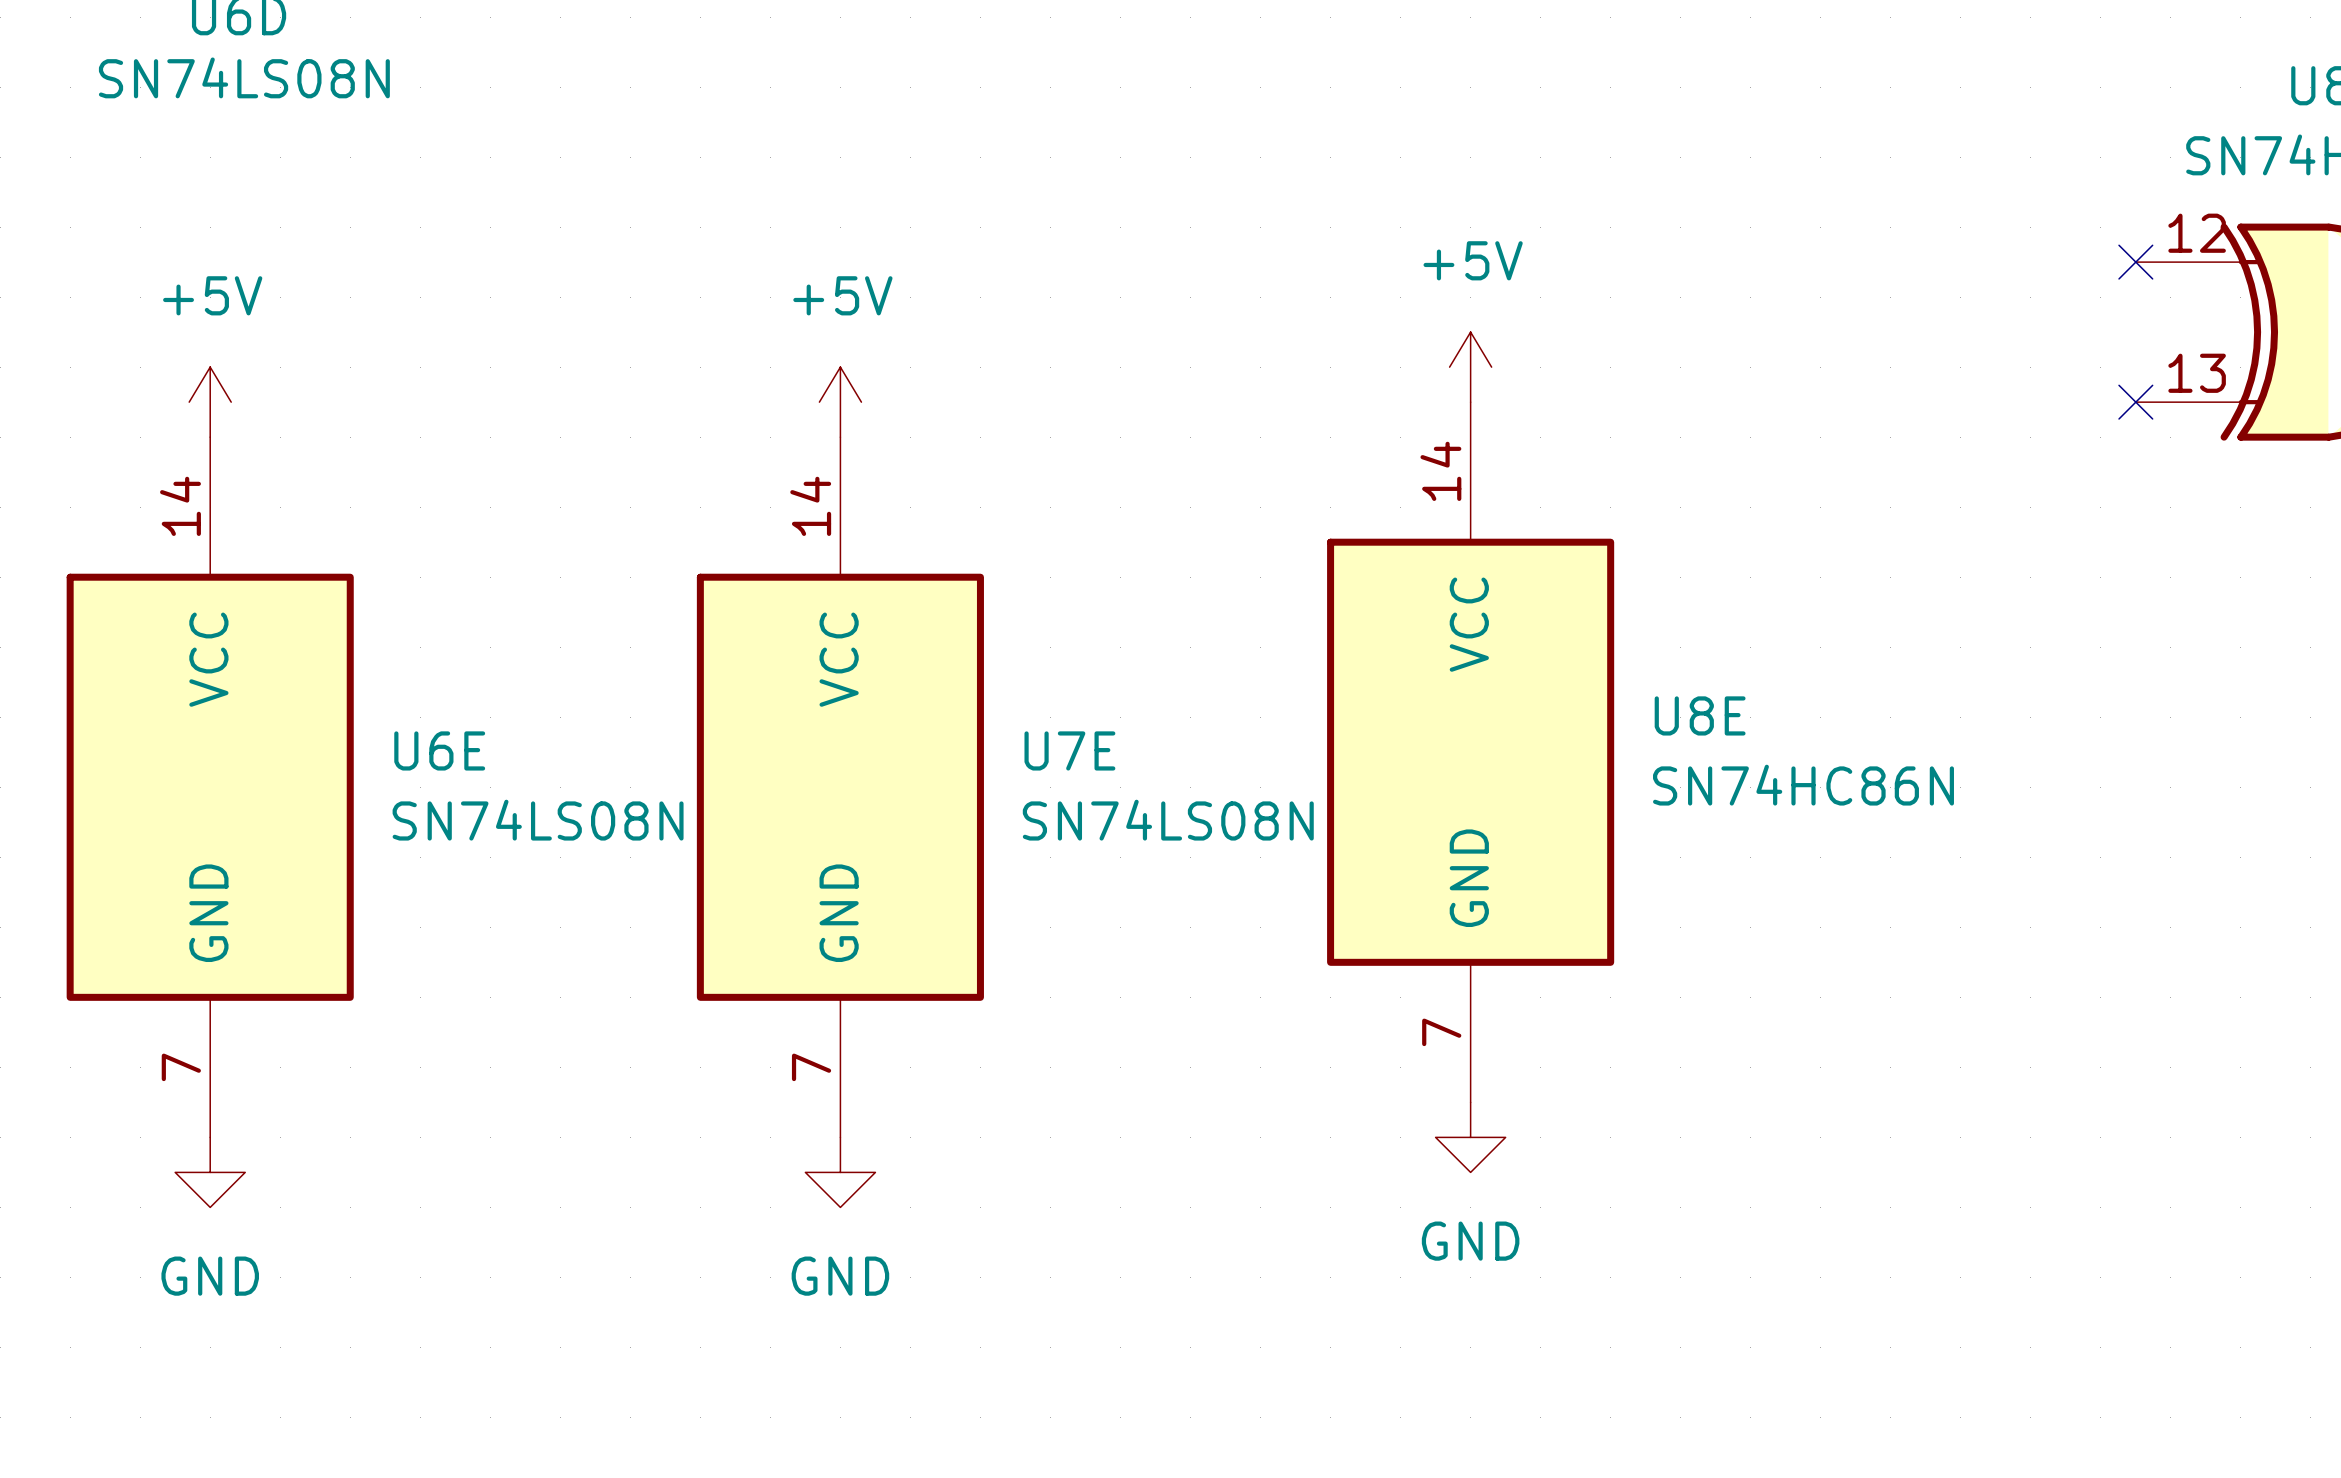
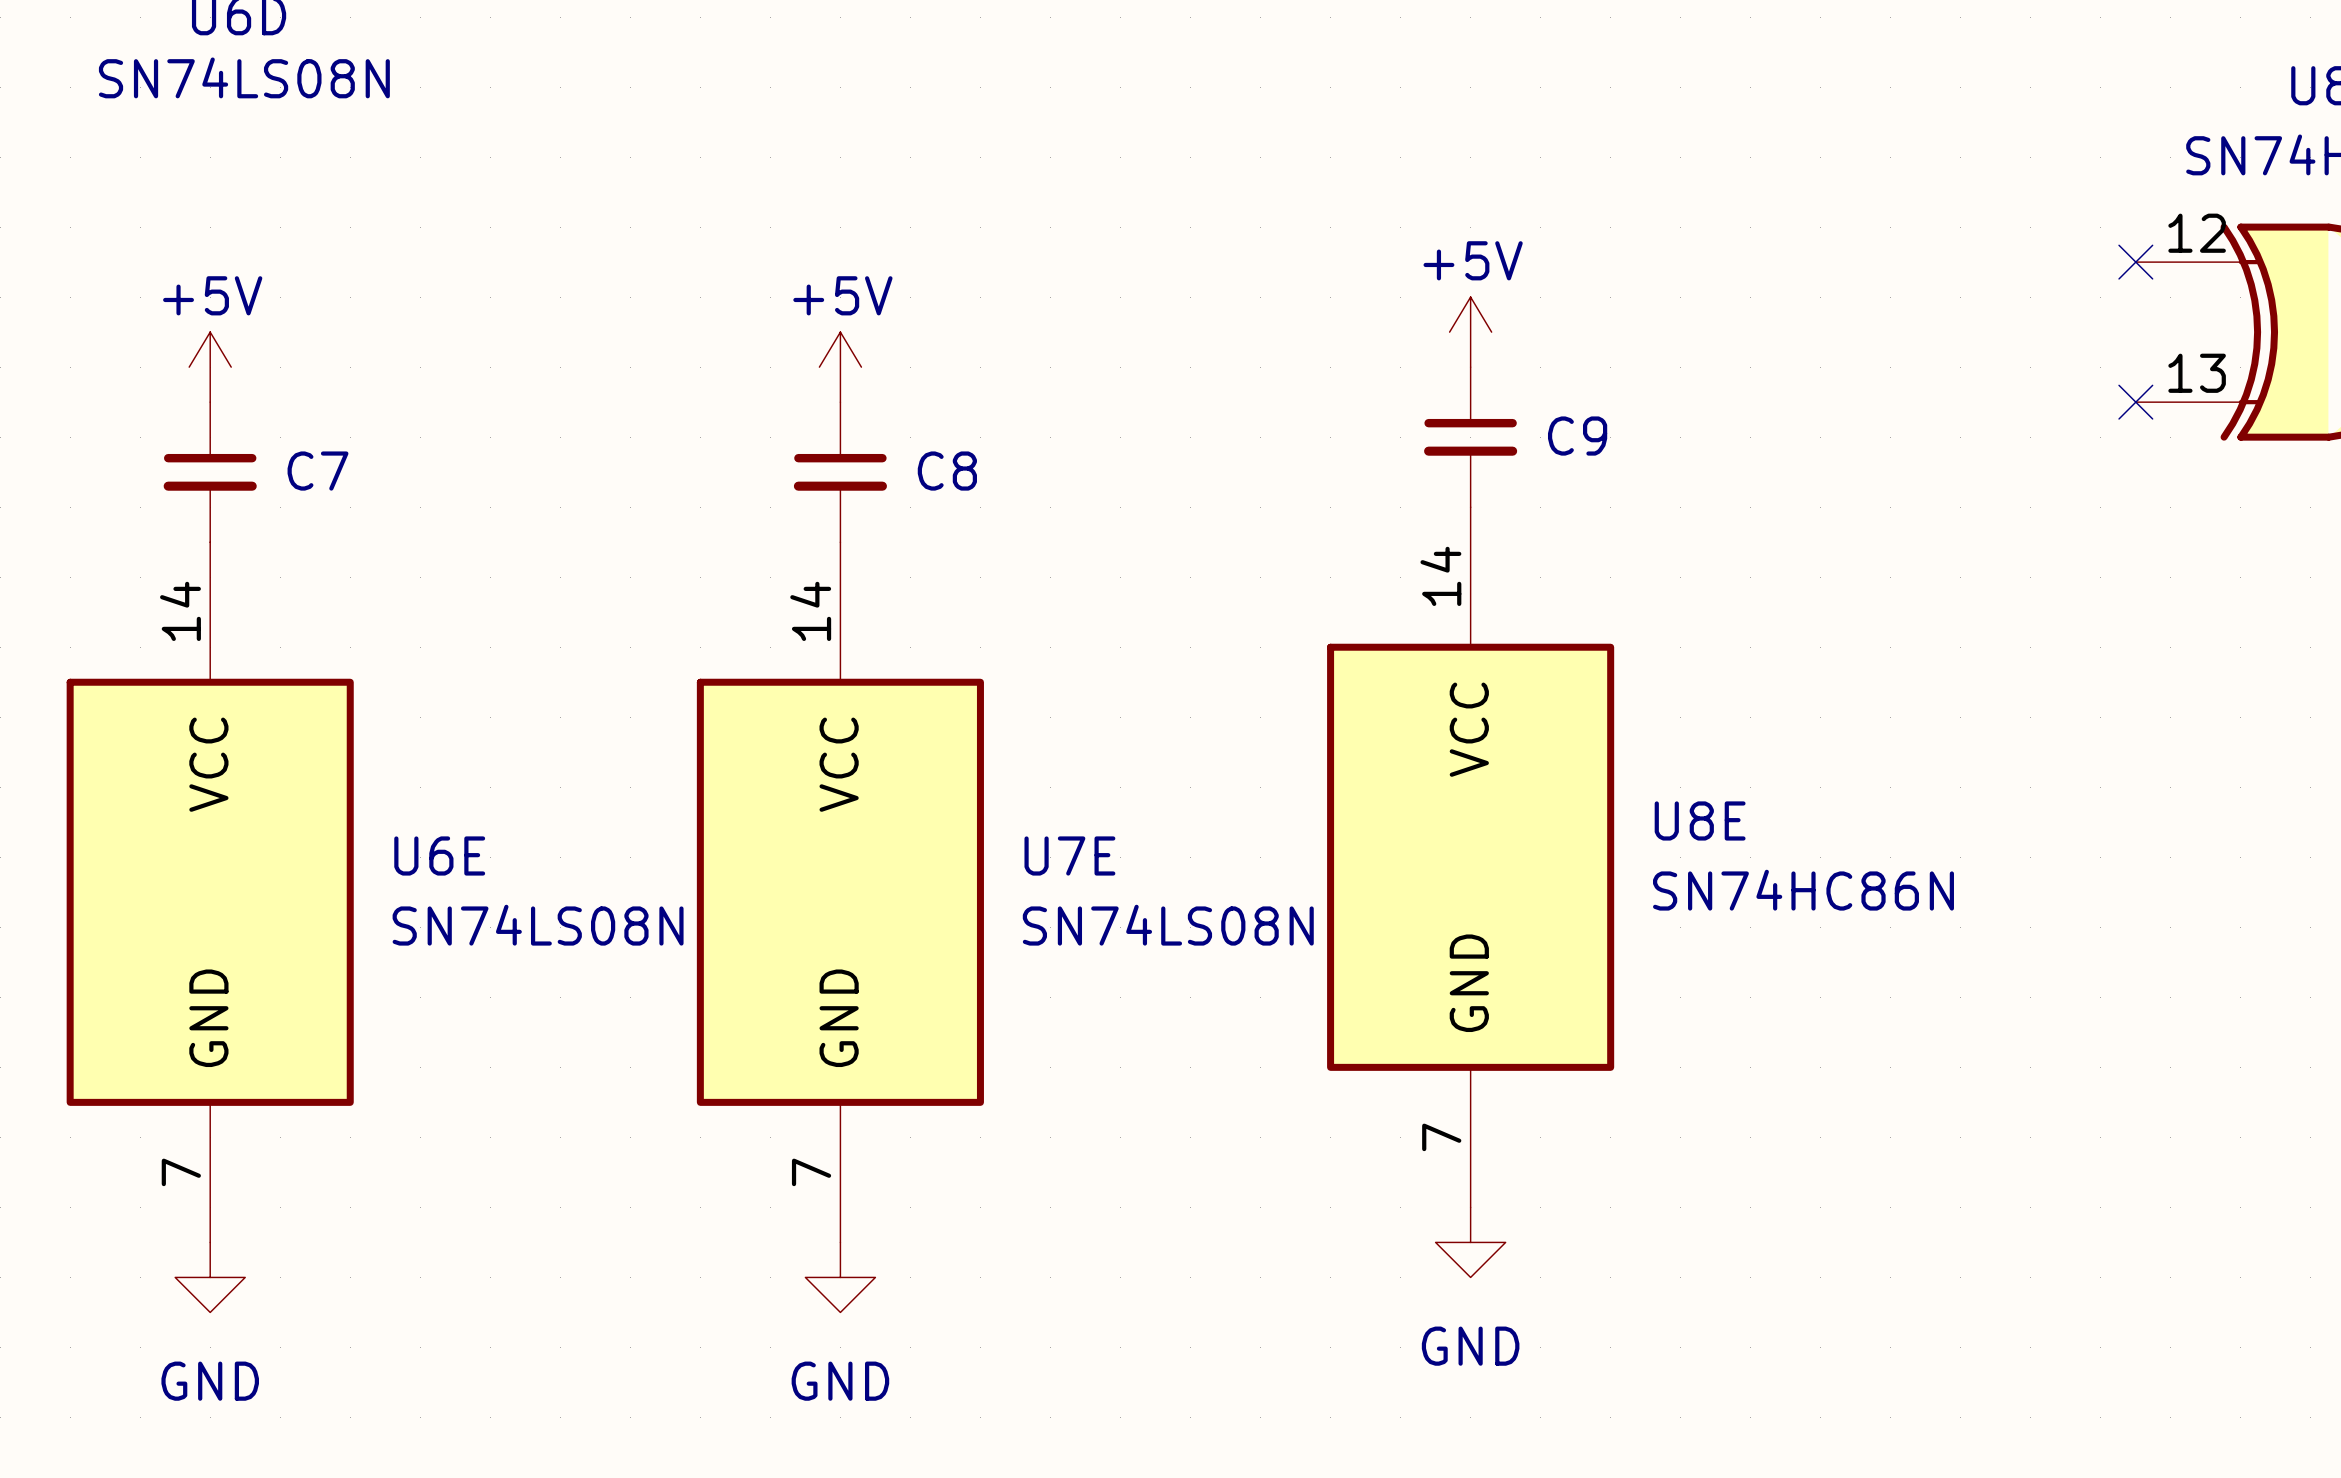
power symbol position: +5V (1470, 367) -> +5V (1470, 332)
power symbol position: +5V (210, 402) -> +5V (210, 367)
power symbol position: +5V (840, 402) -> +5V (840, 367)
C9: none -> (1470, 437)
C7: none -> (210, 472)
C8: none -> (840, 472)
U8E position: (1470, 752) -> (1470, 857)
U6E position: (210, 787) -> (210, 892)
U7E position: (840, 787) -> (840, 892)
power symbol position: GND (1470, 1137) -> GND (1470, 1242)
power symbol position: GND (210, 1172) -> GND (210, 1277)
power symbol position: GND (840, 1172) -> GND (840, 1277)

